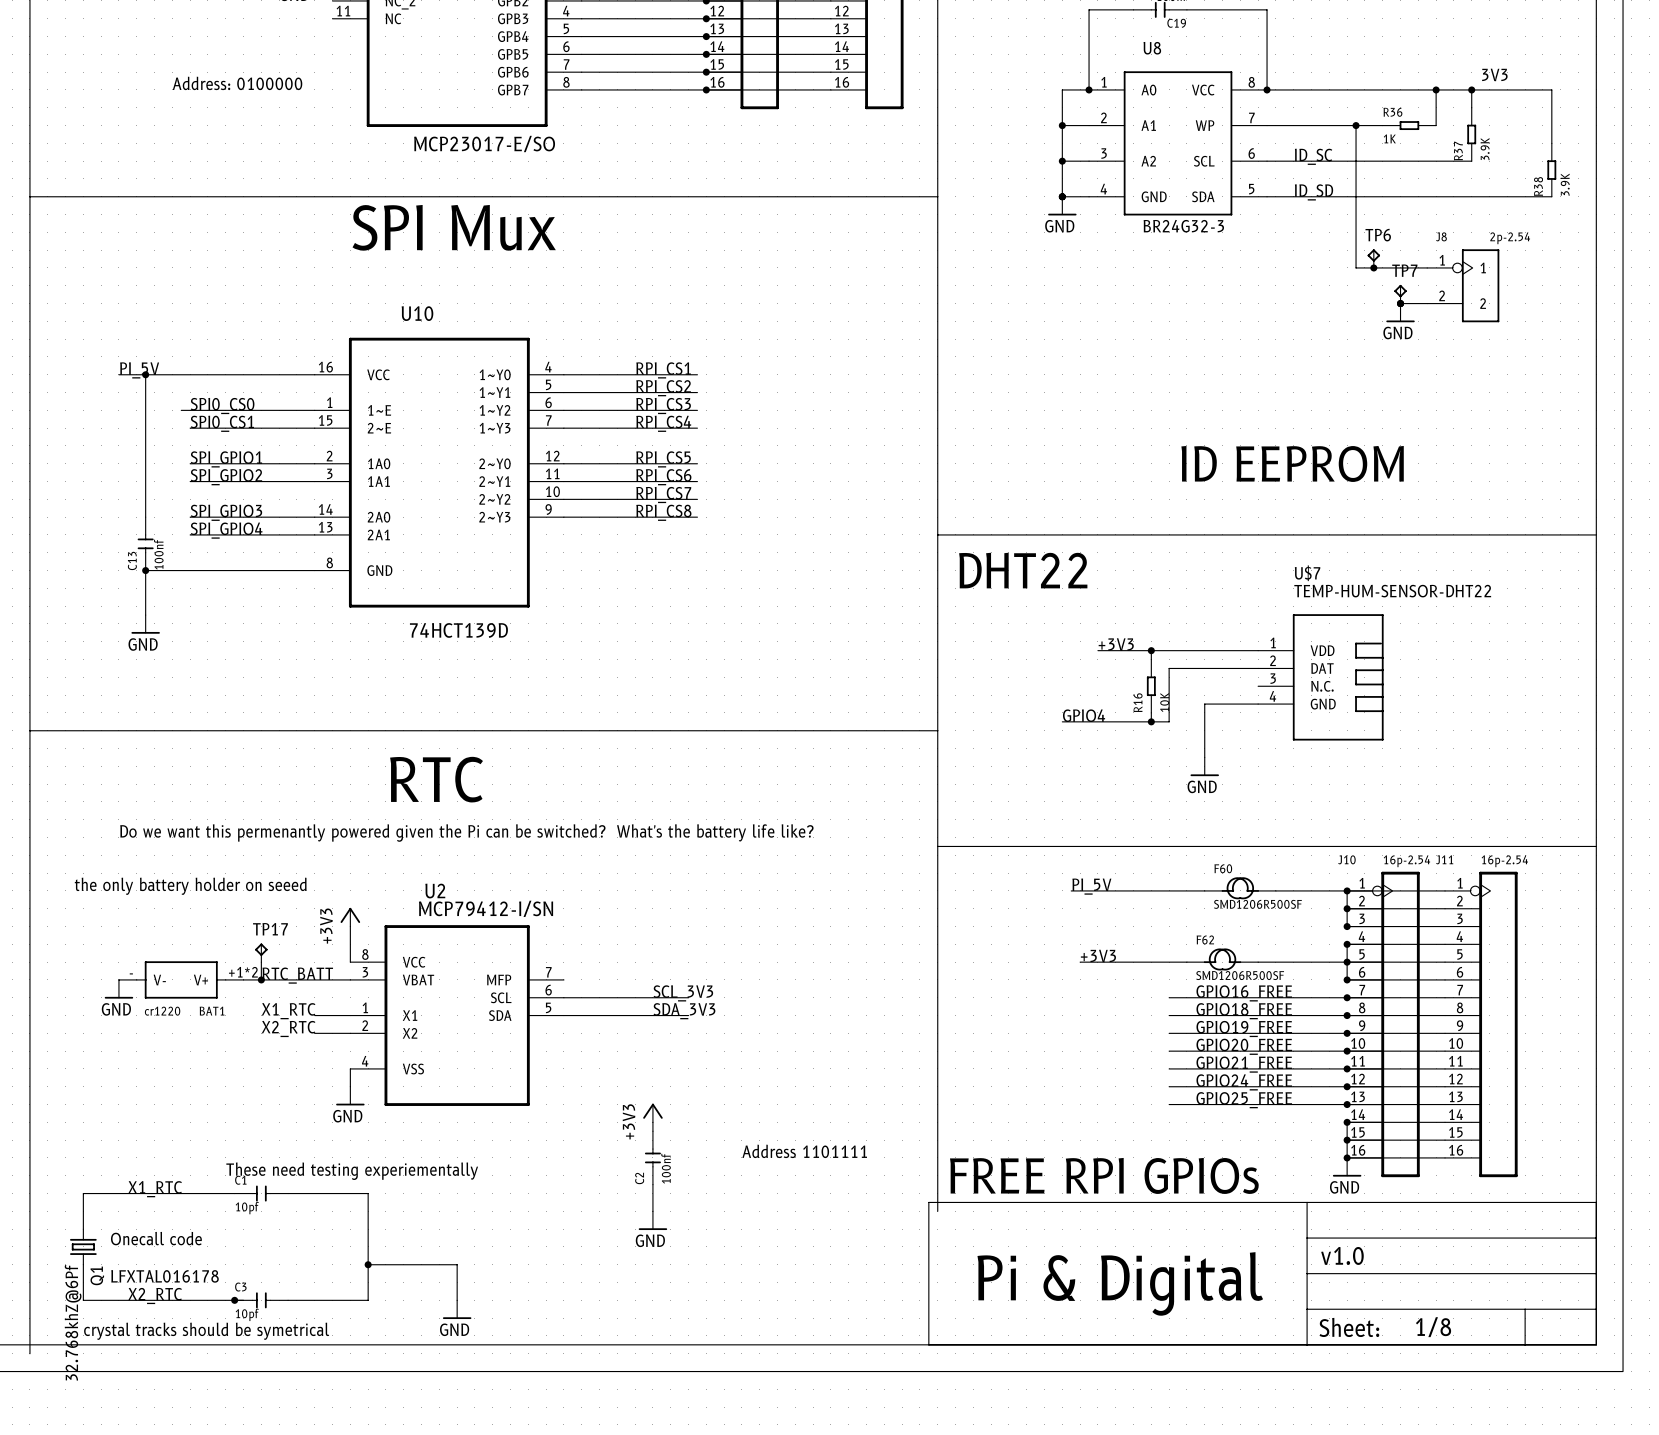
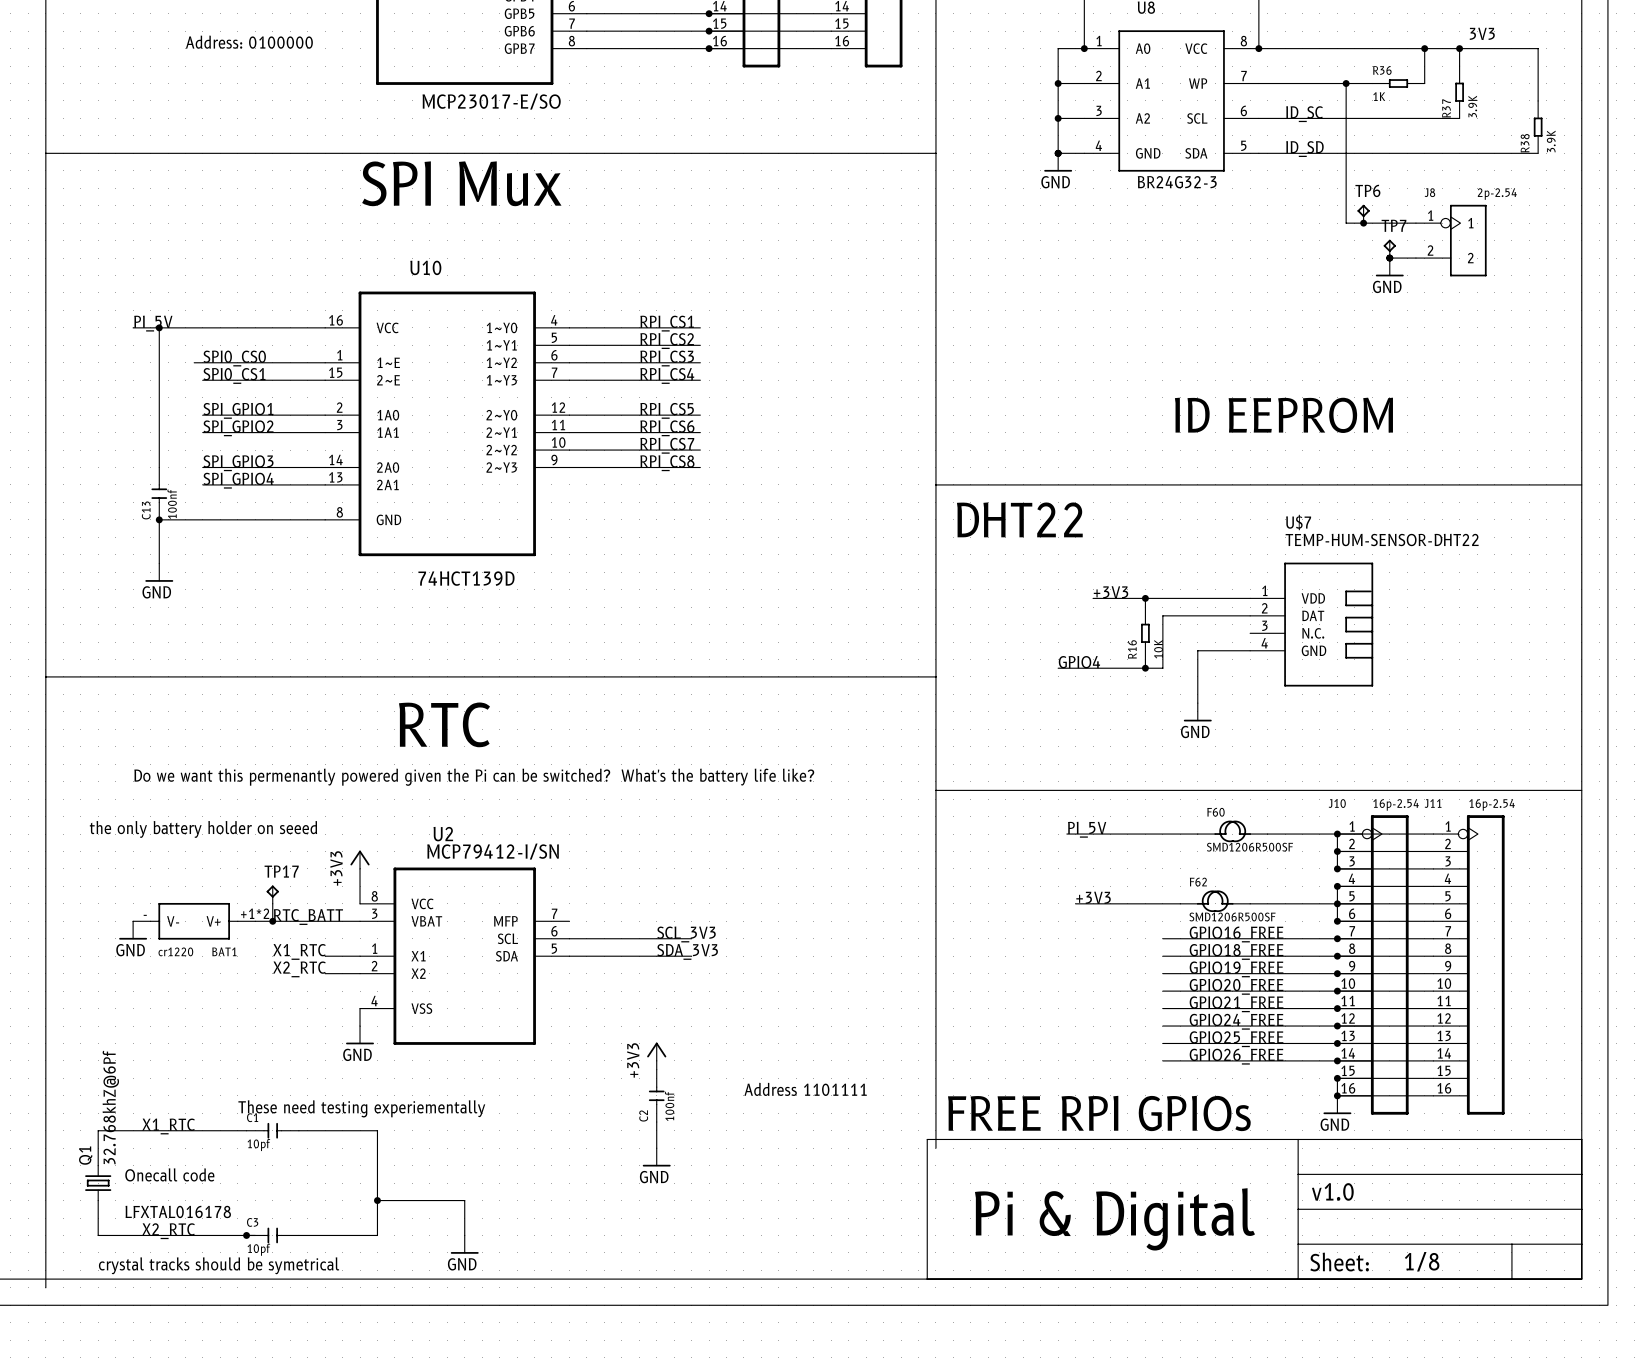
label: none -> GPIO26_FREE (1236, 1056)
wire: (1347, 1122) (1347, 1140) -> (1337, 1060) (1162, 1060)
Q1 name position: Q1 (97, 1275) -> Q1 (85, 1155)
Q1 value position: 32.768khZ@6Pf (73, 1322) -> 32.768khZ@6Pf (110, 1107)

